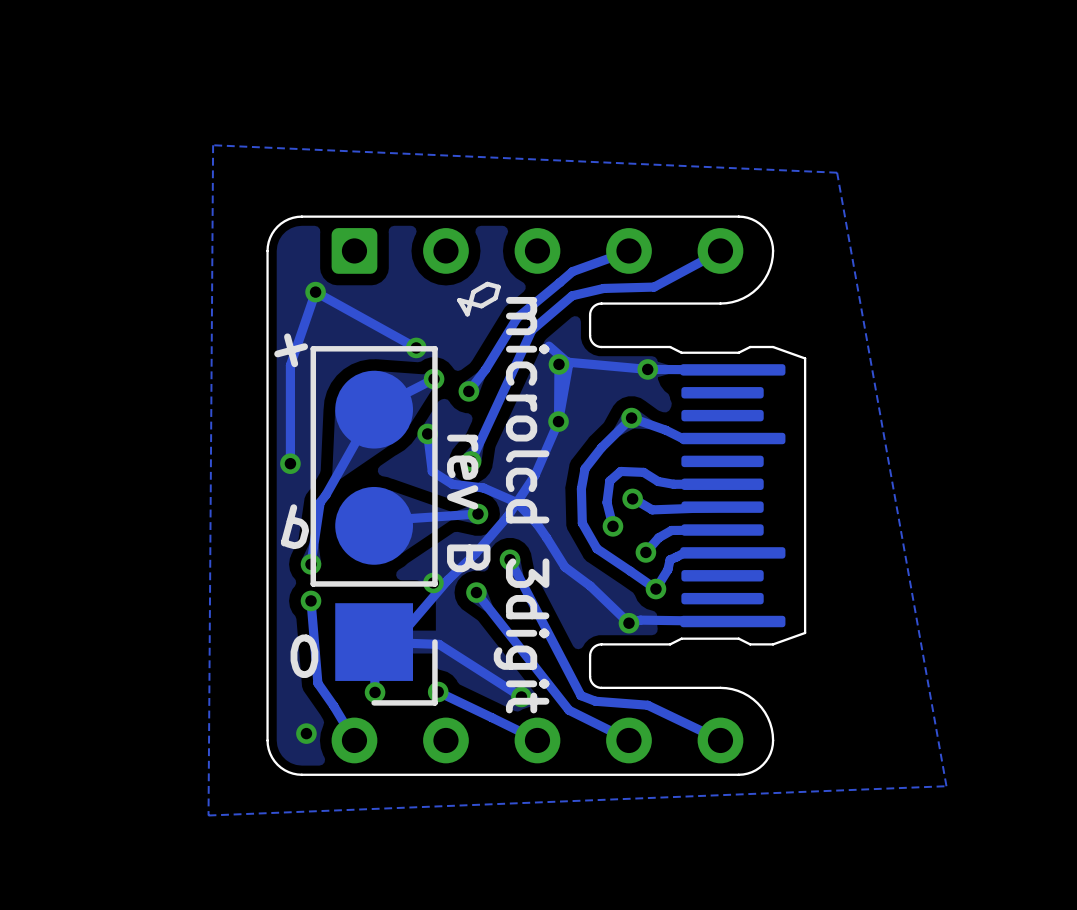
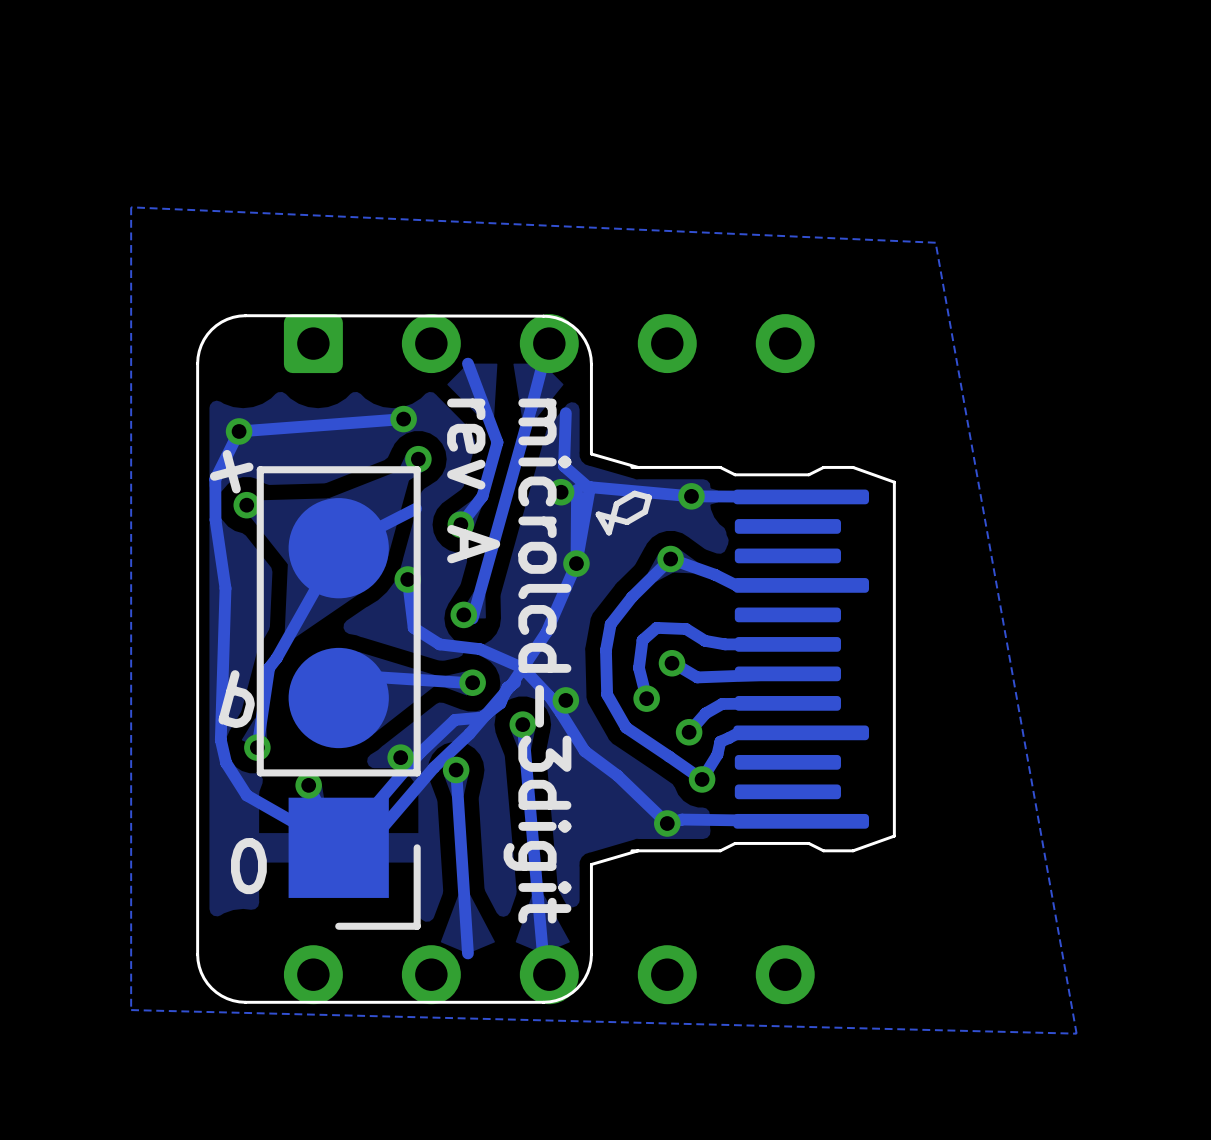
zone outline: (213, 145) (208, 815) (946, 786) -> (131, 207) (131, 1010) (1076, 1033)
track: (629, 250) (572, 271) (517, 317) (485, 369) -> (467, 363) (497, 442) (482, 496)
track: (721, 250) (654, 287) (603, 288) (572, 295) (531, 330) (471, 461) -> none
track: none -> (542, 363) (472, 618)
line: (487, 284) (473, 292) (467, 314) (459, 300) (481, 306) (495, 298) (498, 286) (487, 284) -> (634, 493) (616, 504) (609, 532) (598, 514) (627, 522) (645, 511) (648, 497) (634, 493)
via position: (315, 292) -> (239, 431)
track: none -> (565, 413) (564, 466)
track: none -> (403, 419) (239, 431) (215, 479) (215, 519) (225, 588) (220, 739) (226, 762) (246, 795) (338, 847)
via: none -> (403, 419)
track: (416, 347) (315, 292) (290, 365) (290, 463) -> none
via position: (416, 347) -> (418, 459)
board edge: (601, 347) (593, 343) (590, 336) (590, 312) (597, 304) (726, 303) (737, 300) (753, 292) (765, 278) (771, 262) (772, 246) (766, 230) (751, 219) (738, 216) (301, 216) (288, 219) (274, 230) (270, 237) (267, 250) (268, 749) (274, 761) (280, 767) (288, 772) (301, 774) (738, 774) (751, 772) (766, 761) (772, 744) (771, 728) (765, 712) (753, 699) (737, 690) (726, 688) (597, 687) (590, 678) (590, 654) (593, 647) (601, 644) -> none
board edge: none -> (638, 467) (591, 453) (589, 351) (585, 340) (577, 330) (567, 322) (555, 317) (543, 316) (239, 316) (227, 319) (216, 325) (204, 339) (199, 351) (197, 363) (197, 954) (201, 972) (211, 988) (227, 998) (245, 1002) (543, 1002) (555, 1000) (567, 995) (577, 988) (585, 978) (589, 966) (591, 864) (638, 850)
via position: (558, 364) -> (561, 492)
via: none -> (246, 505)
via: (434, 379) -> none
via: (290, 463) -> none
text: rev B (468, 503) -> rev A (473, 480)
text: microlcd 3digit (521, 505) -> microlcd-3digit (537, 661)
track: (478, 514) (397, 519) -> (472, 683) (354, 675)
track: none -> (515, 682) (507, 687) (500, 703) (482, 717) (454, 719) (419, 753) (338, 847)
via: none -> (565, 700)
track: none -> (522, 724) (542, 953)
track: (510, 559) (580, 695) (595, 701) (647, 705) (721, 740) -> none
via position: (510, 559) -> (522, 724)
track: none -> (456, 770) (467, 953)
via position: (433, 582) -> (400, 757)
track: (476, 592) (569, 710) (629, 740) -> none
via position: (476, 592) -> (456, 770)
track: (311, 600) (317, 683) (354, 740) -> none
via position: (311, 600) -> (308, 785)
track: (438, 691) (538, 740) -> none
via: (438, 691) -> none
track: (375, 692) (374, 642) (439, 644) (521, 697) -> none
via: (375, 692) -> none
via: (521, 697) -> none
via: (306, 733) -> none

